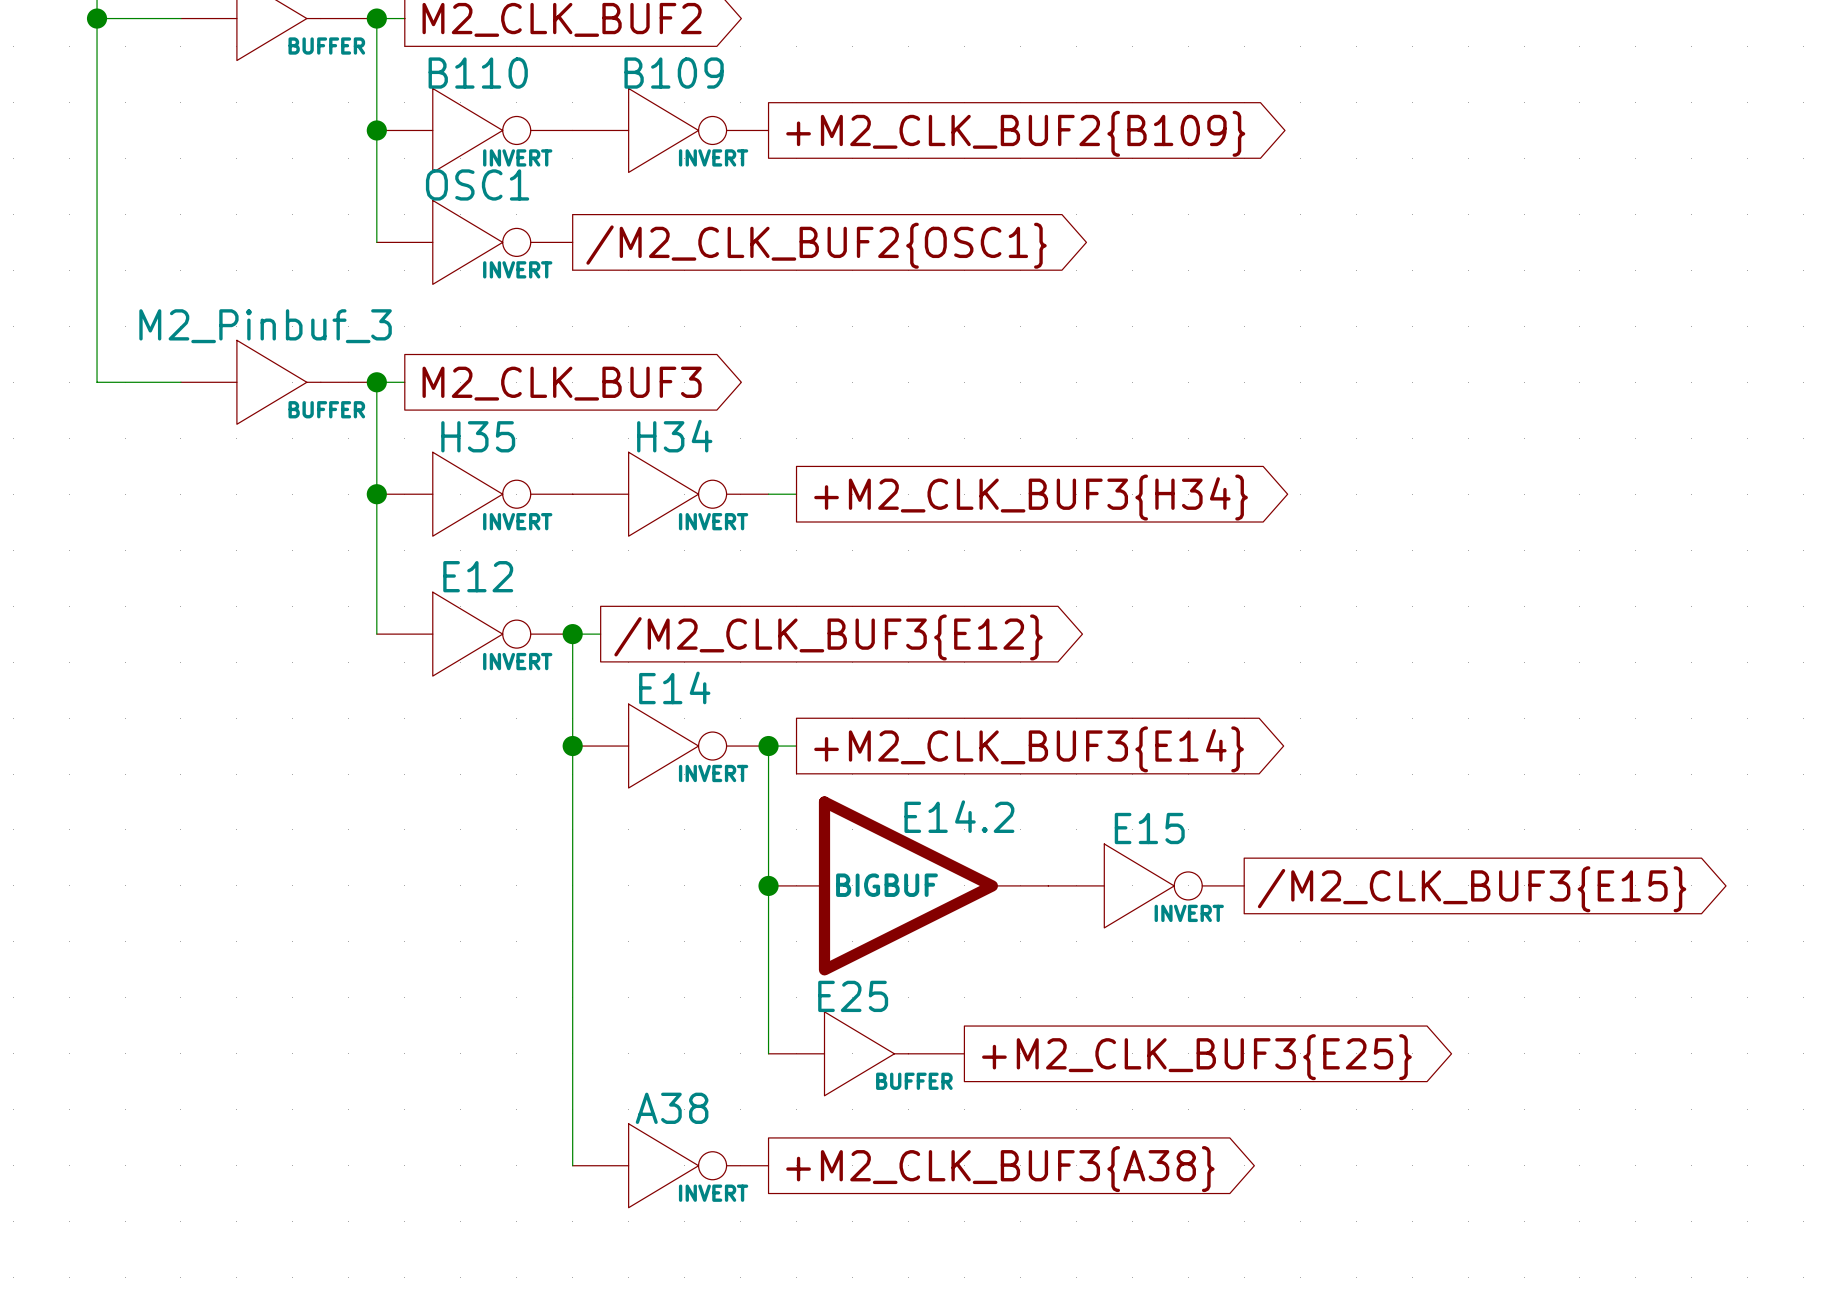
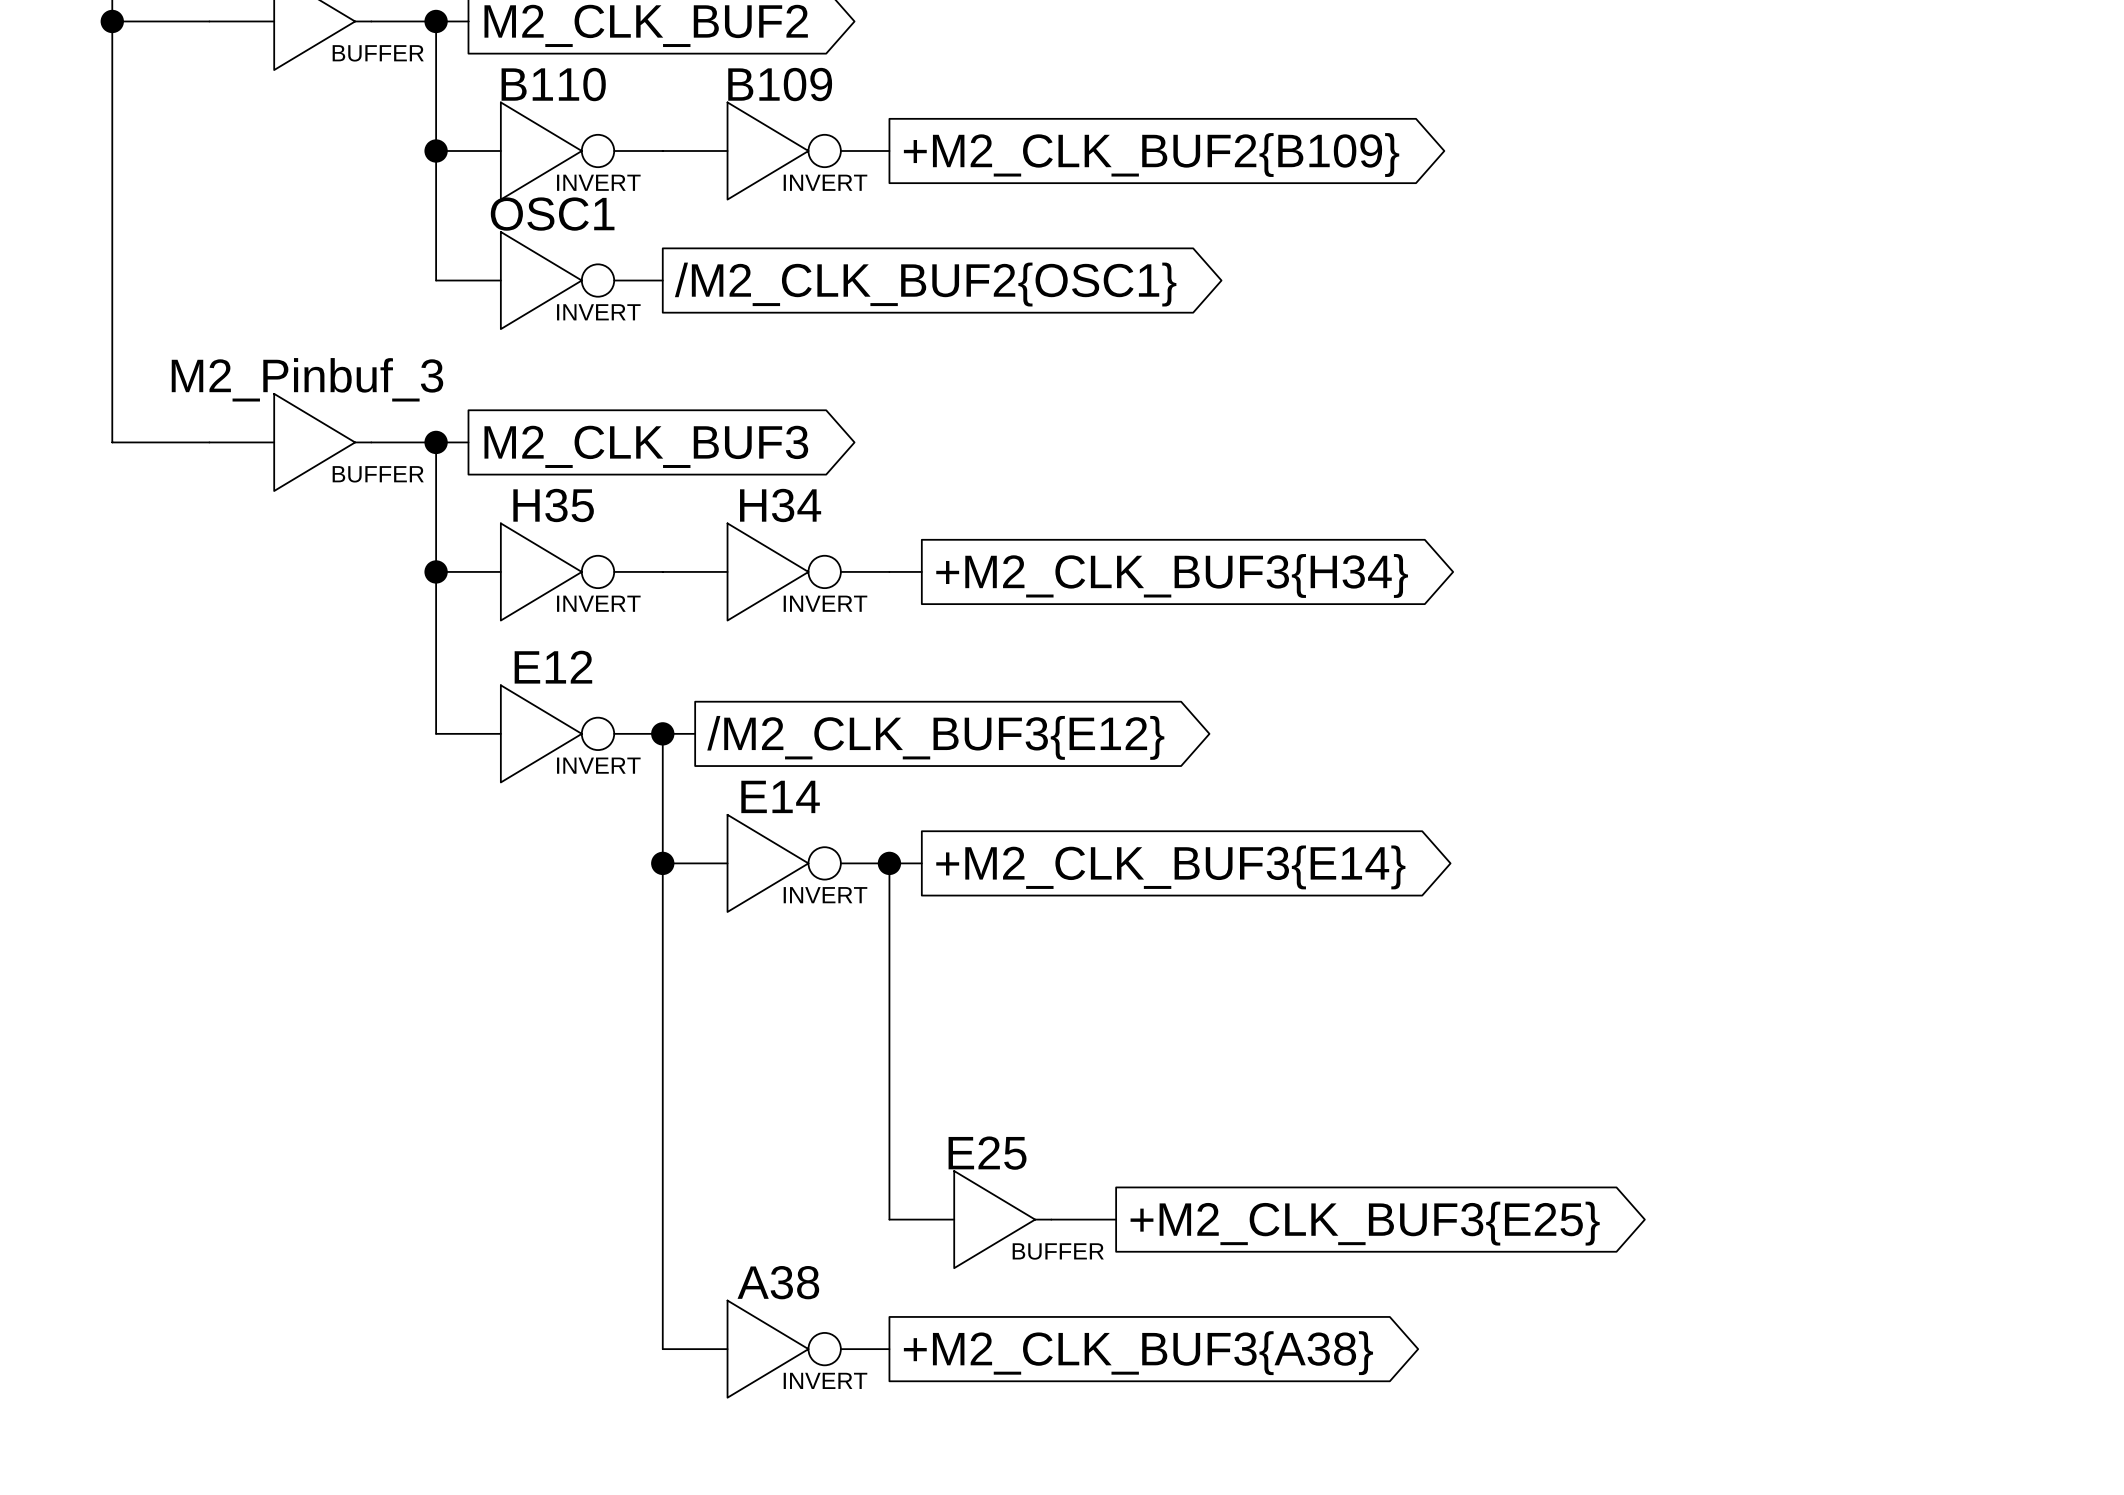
junction: (768, 885) -> none
E14.2: BIGBUF (908, 885) -> none
E15: INVERT (1146, 885) -> none
global label: /M2_CLK_BUF3{E15} (1472, 889) -> none

